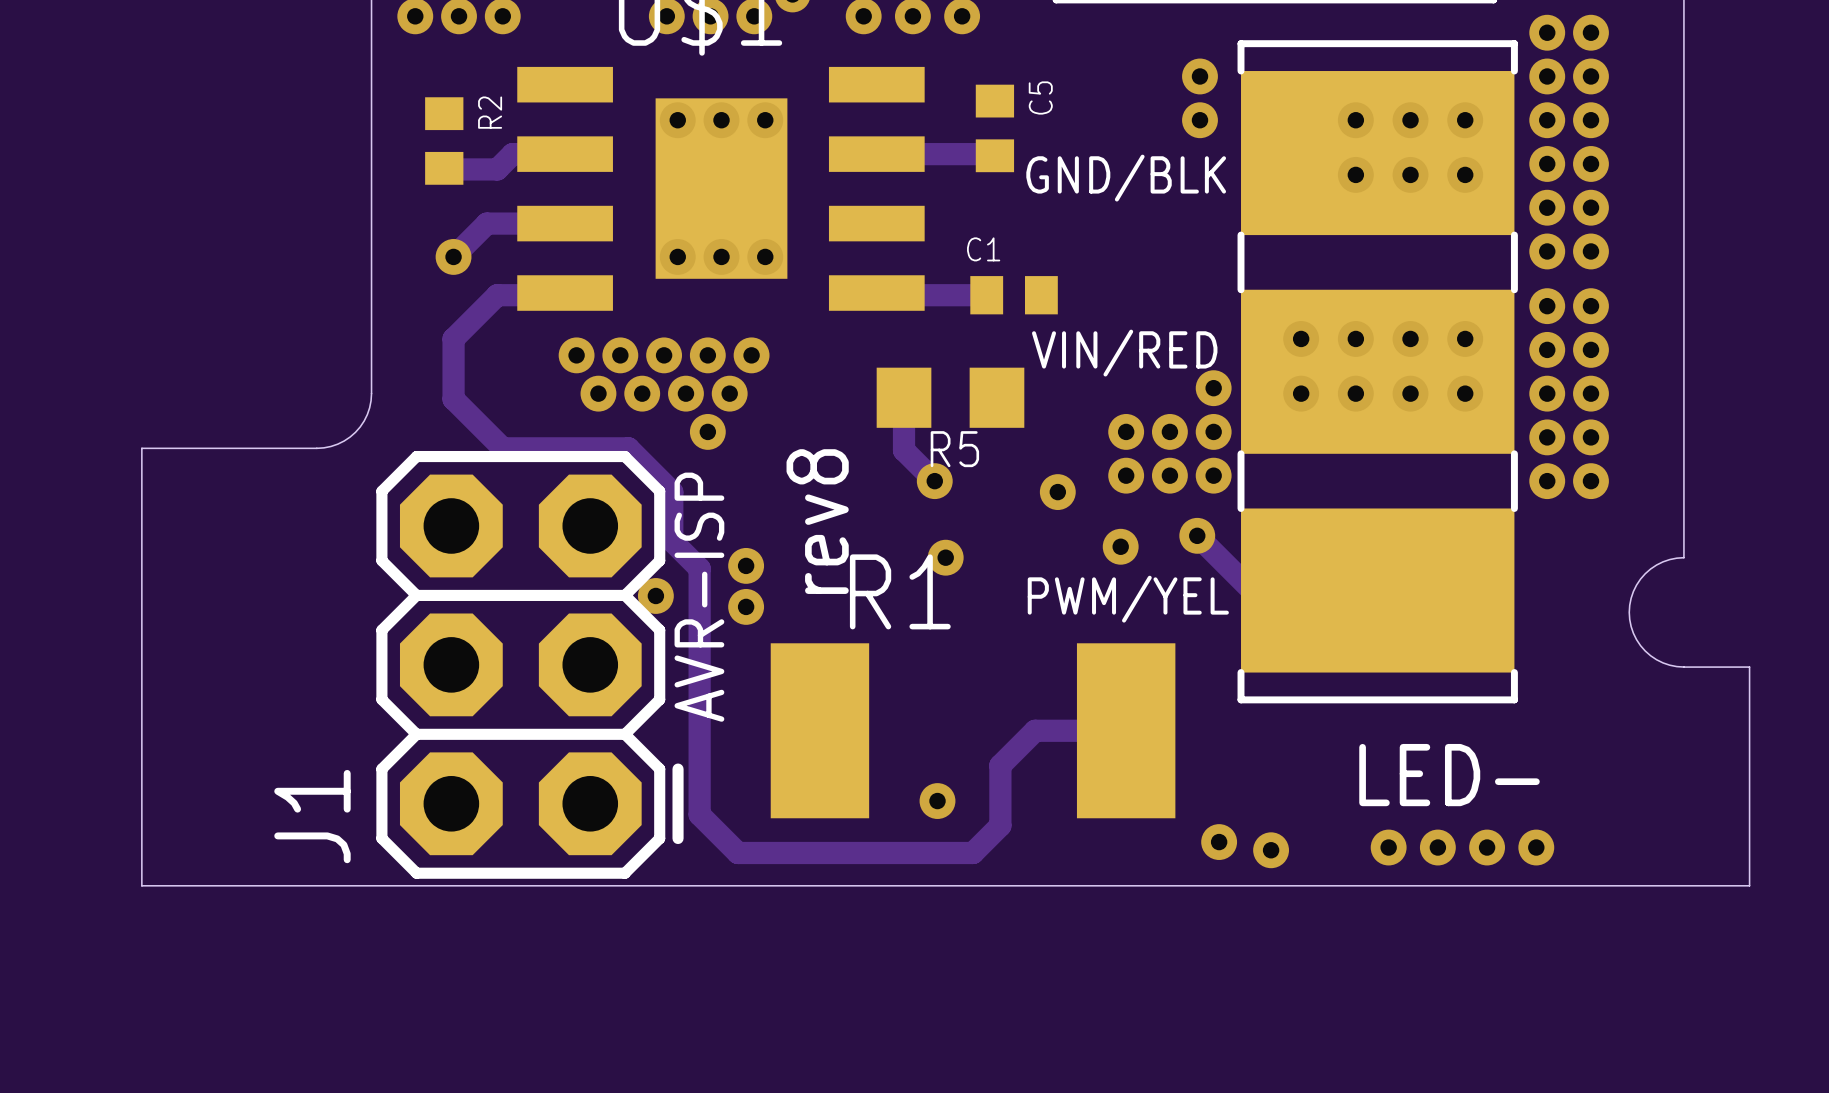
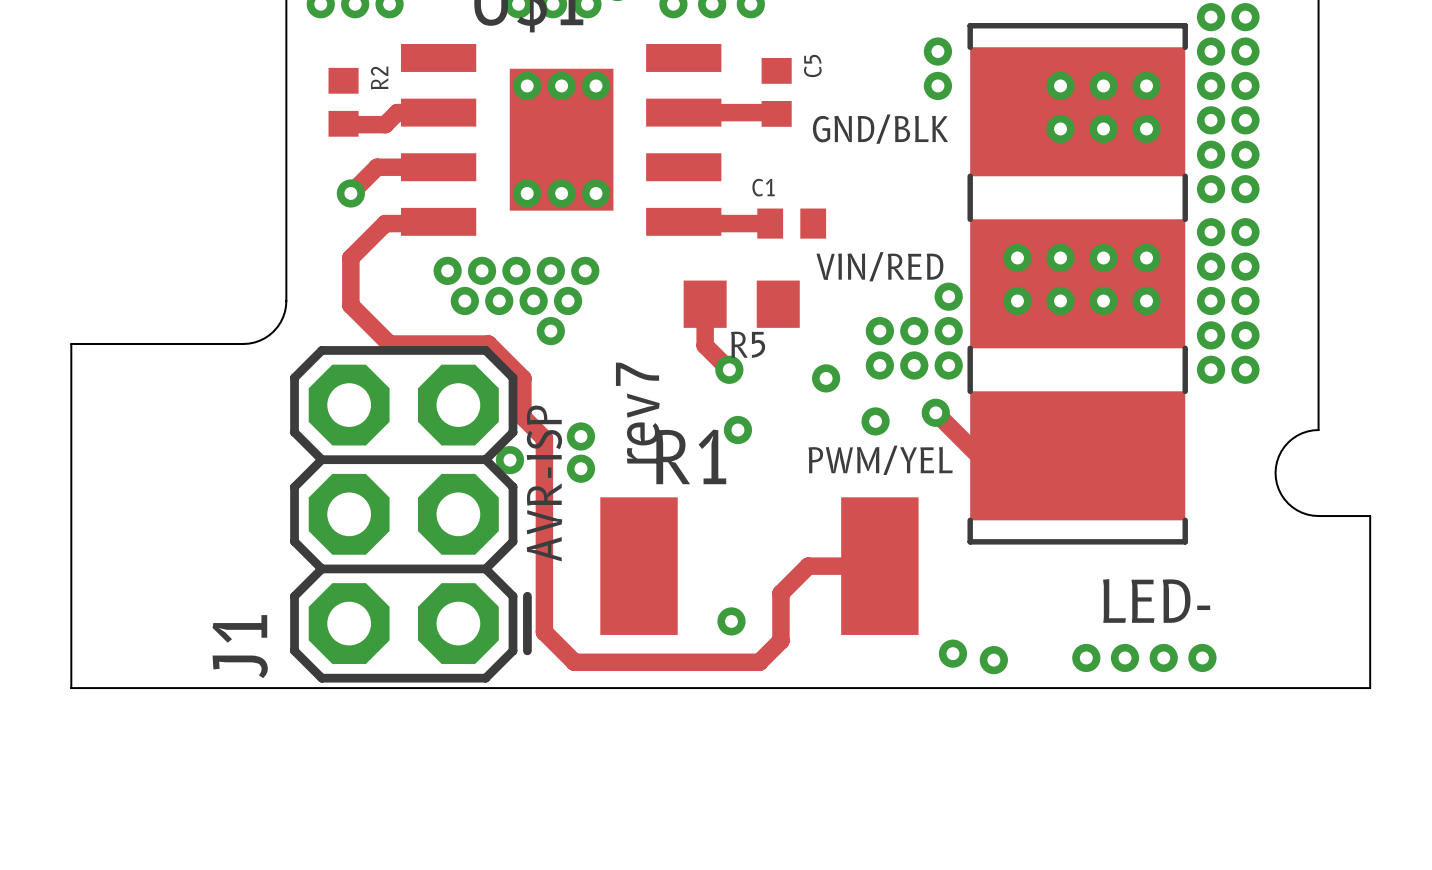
board edge: (141, 448) (141, 885) -> (105, 344) (71, 344) (71, 688) (105, 688)
text: rev8 (817, 521) -> rev7 (637, 413)

